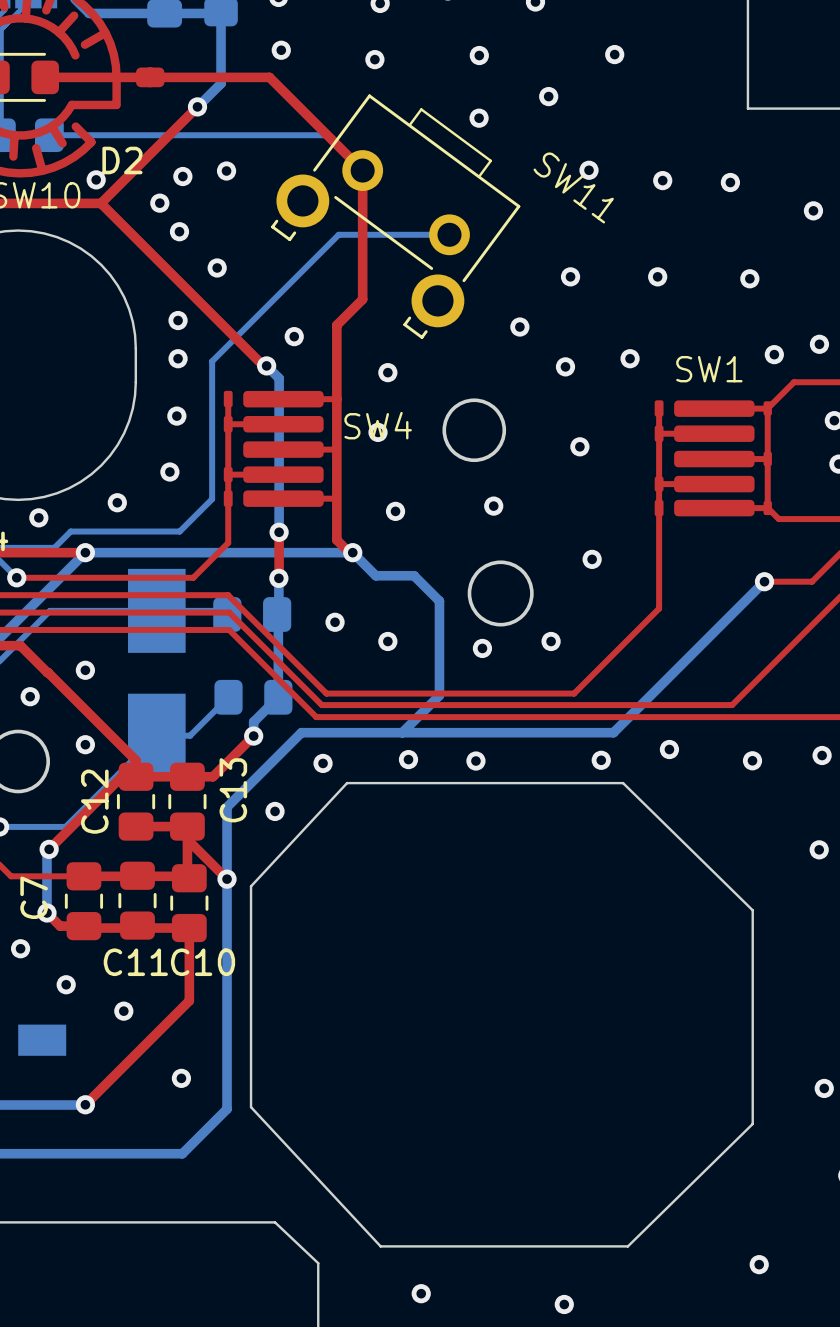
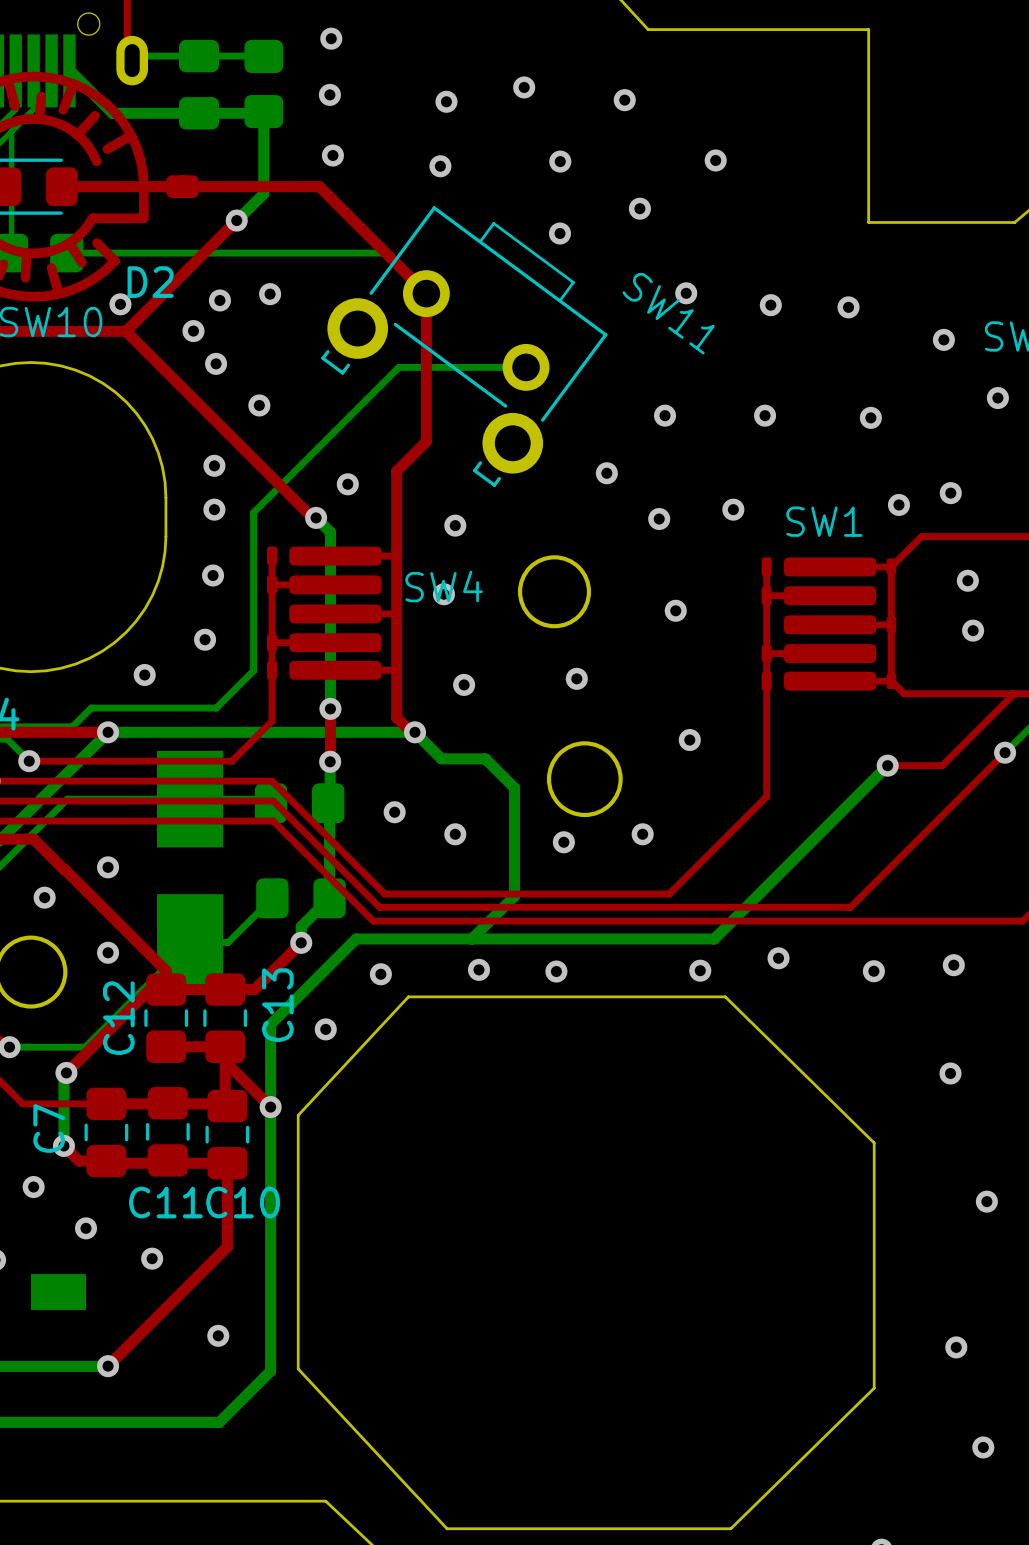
via: (38, 517) -> none

